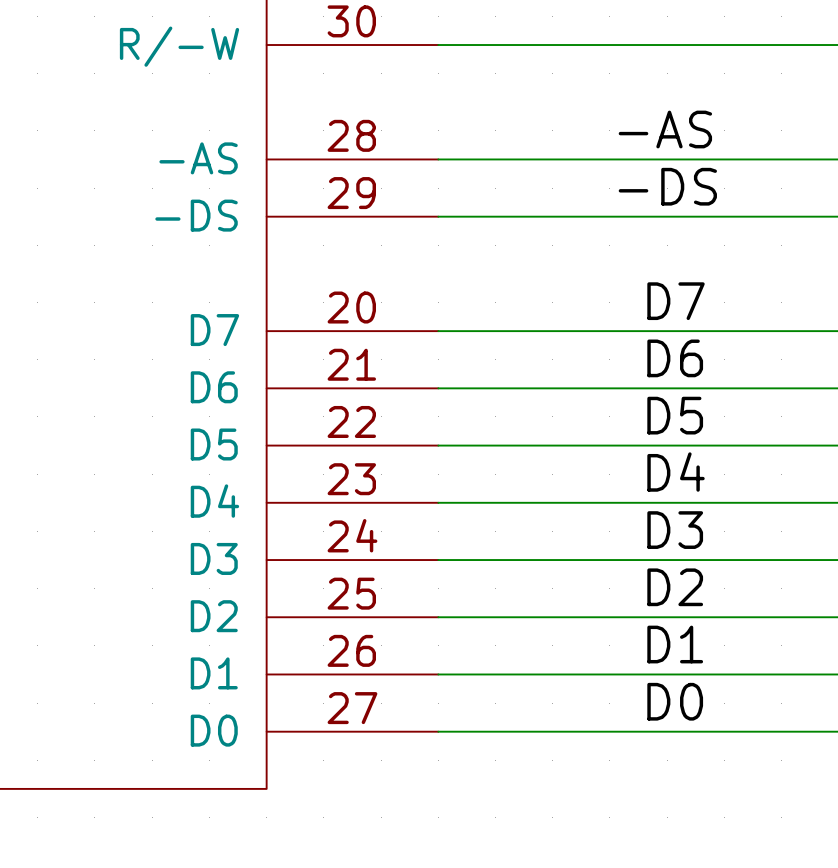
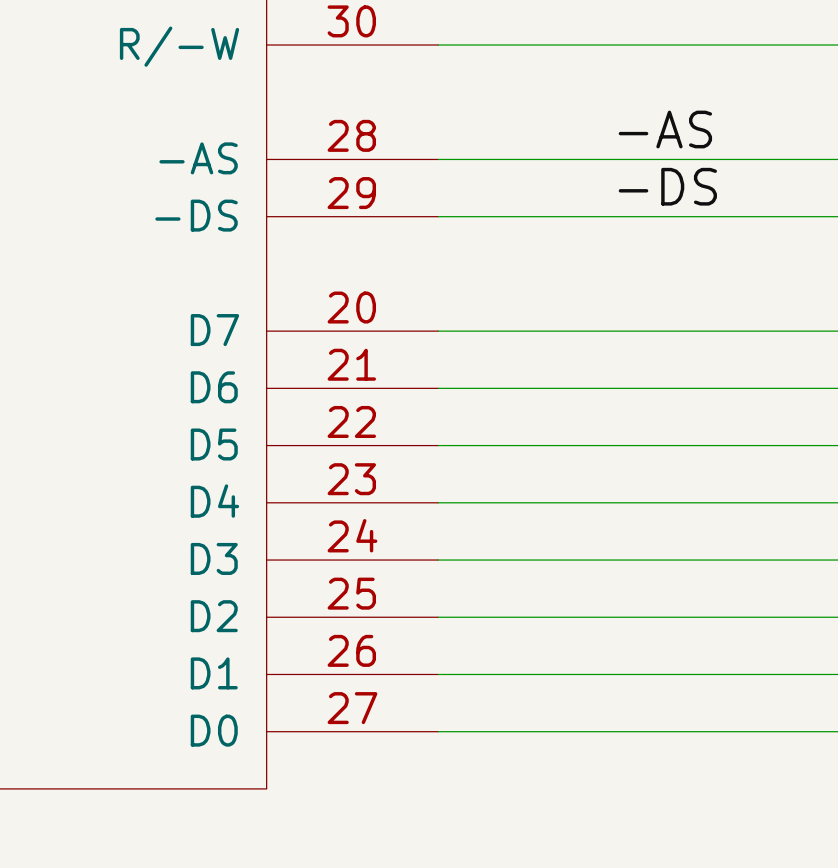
label: D7 (676, 301) -> none
label: D6 (675, 358) -> none
label: D5 (675, 415) -> none
label: D4 (676, 472) -> none
label: D3 (675, 530) -> none
label: D2 (675, 587) -> none
label: D1 (675, 644) -> none
label: D0 (675, 701) -> none

